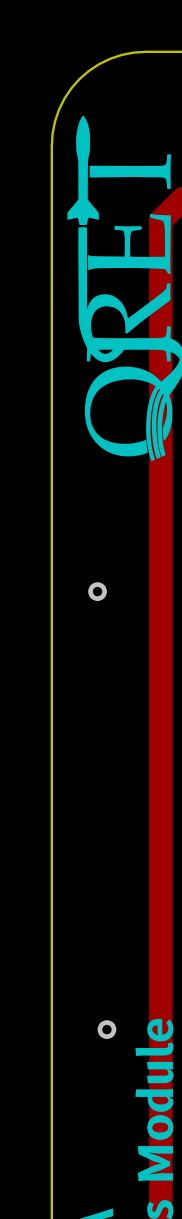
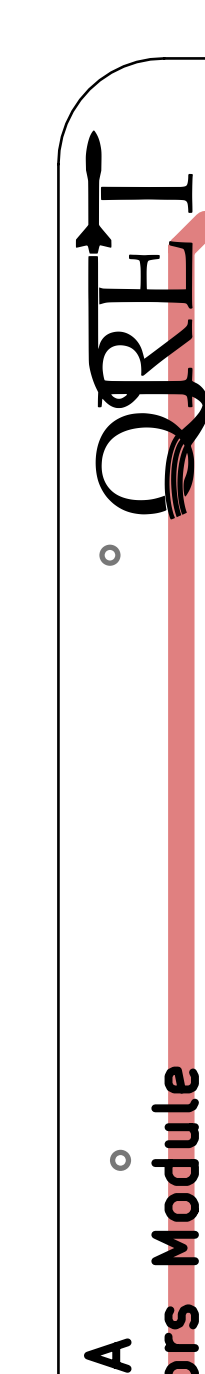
via position: (97, 591) -> (109, 555)

